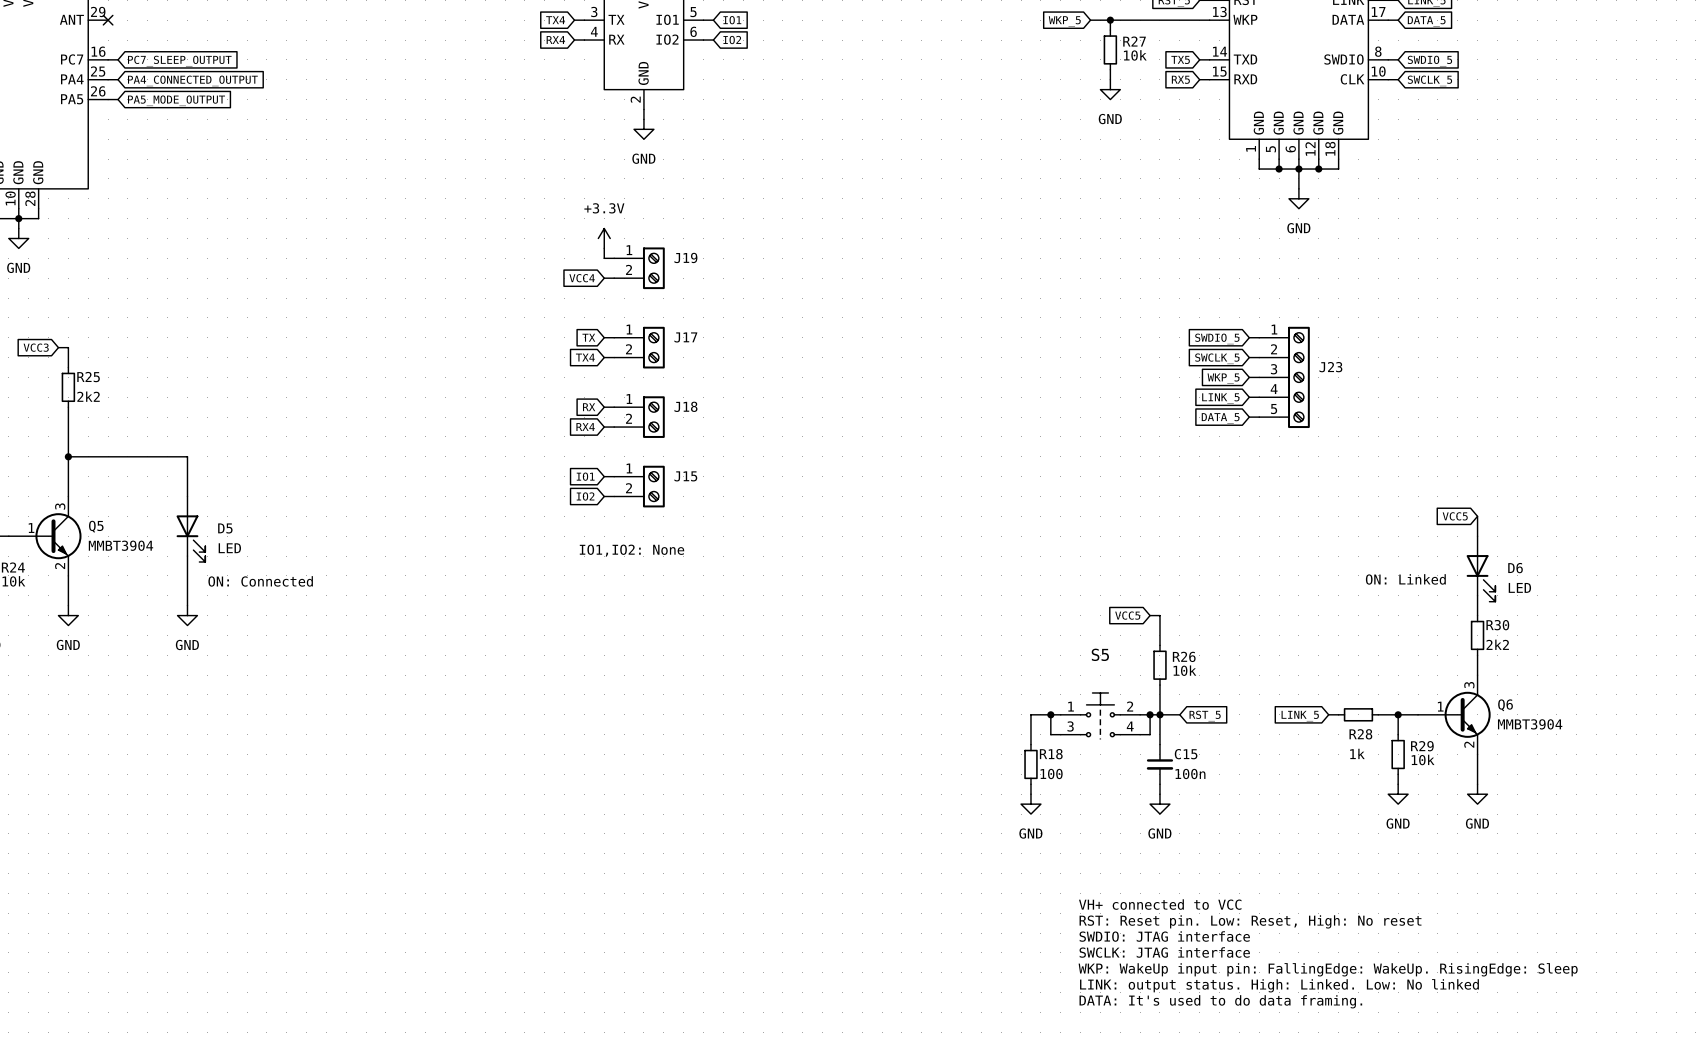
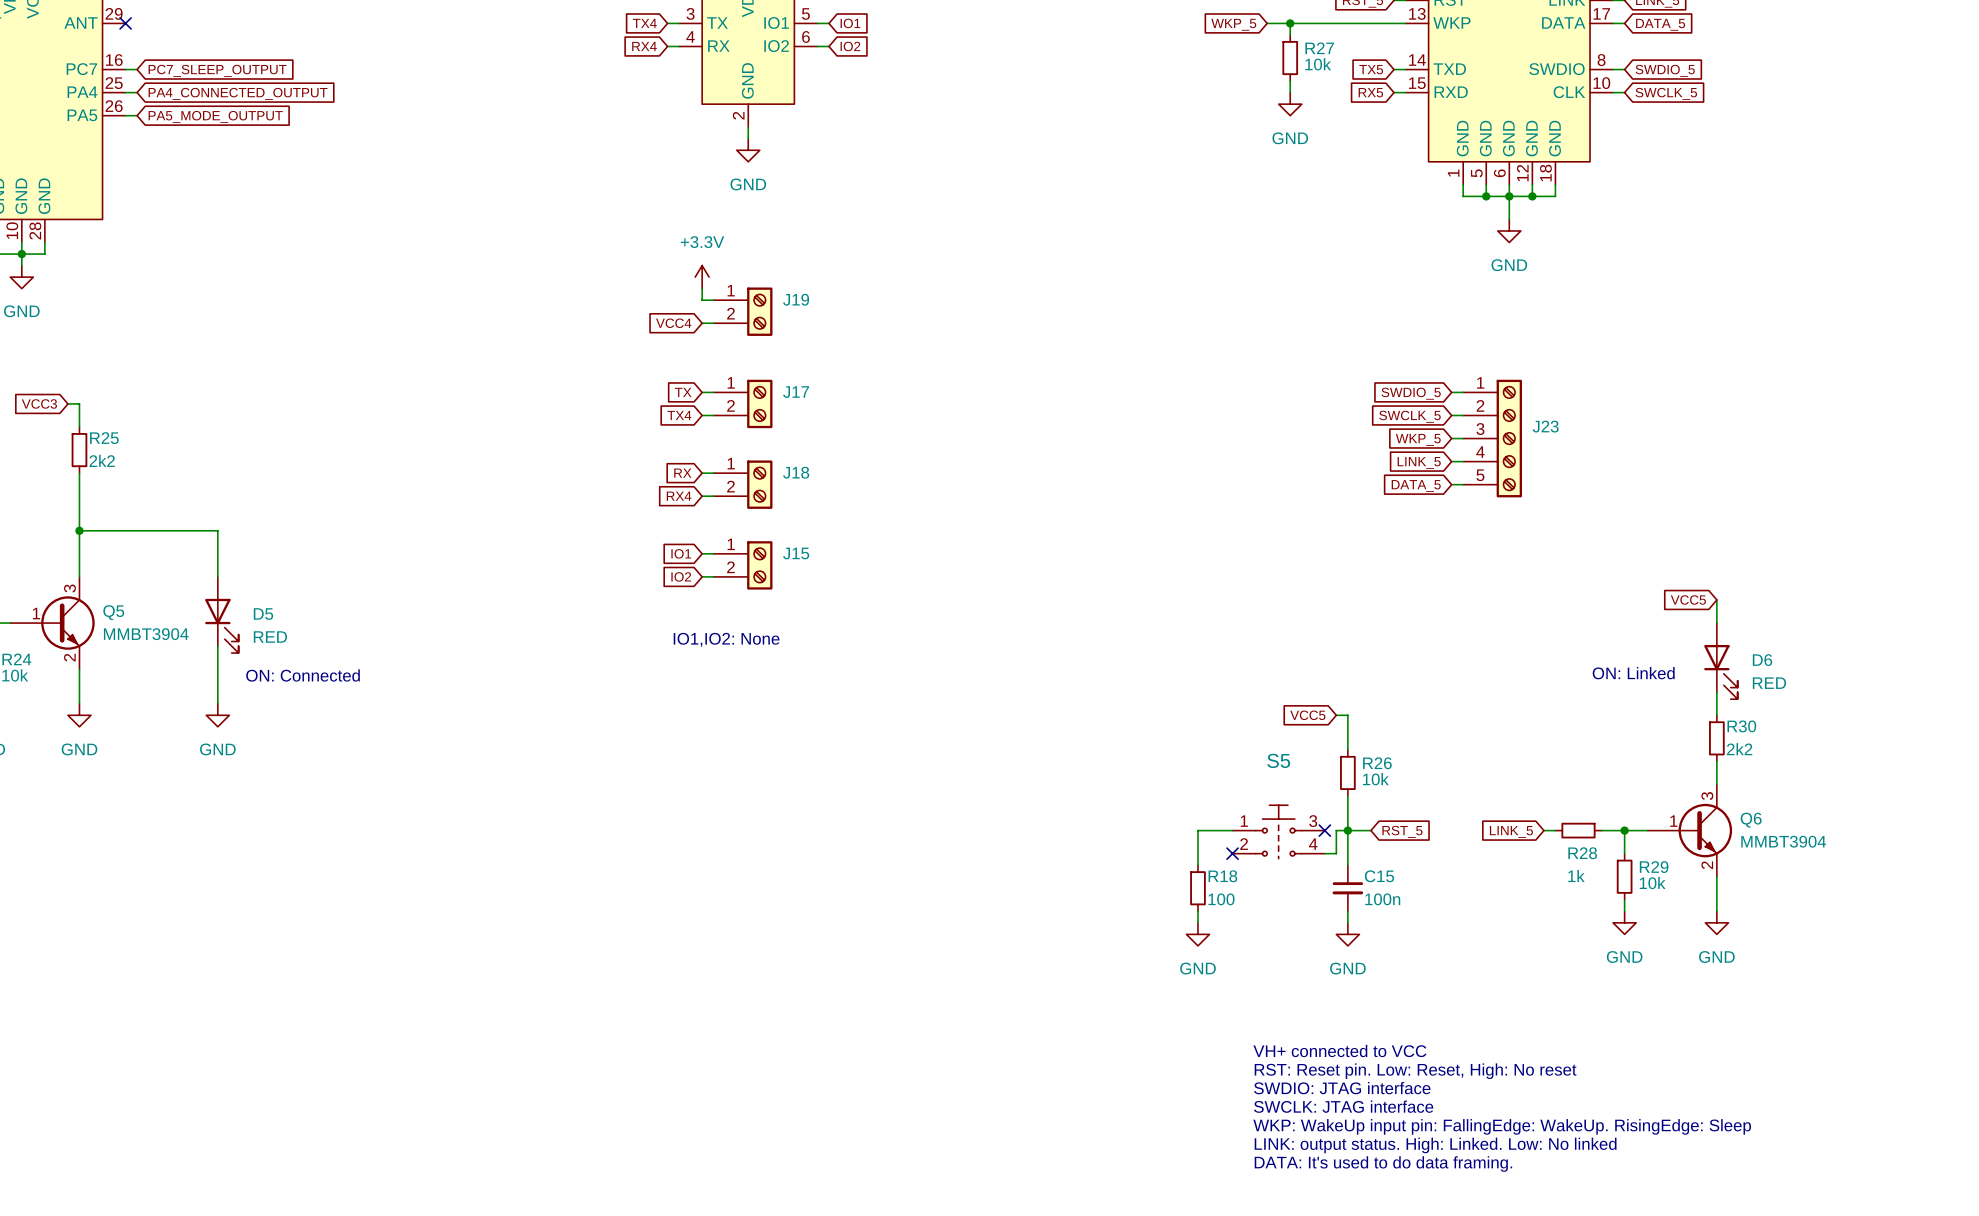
D5 value: LED (229, 548) -> RED (270, 637)
D6 value: LED (1519, 587) -> RED (1769, 683)
S5 pin number: 2 (1130, 706) -> 3 (1313, 821)
wire: (1050, 714) (1050, 734) (1060, 734) -> none
junction: (1050, 714) -> none
wire: (1140, 714) (1150, 714) -> none
no-connect mark: none -> (1324, 830)
junction: (1150, 714) -> none
S5 pin number: 3 (1070, 726) -> 2 (1244, 844)
no-connect mark: none -> (1232, 853)

